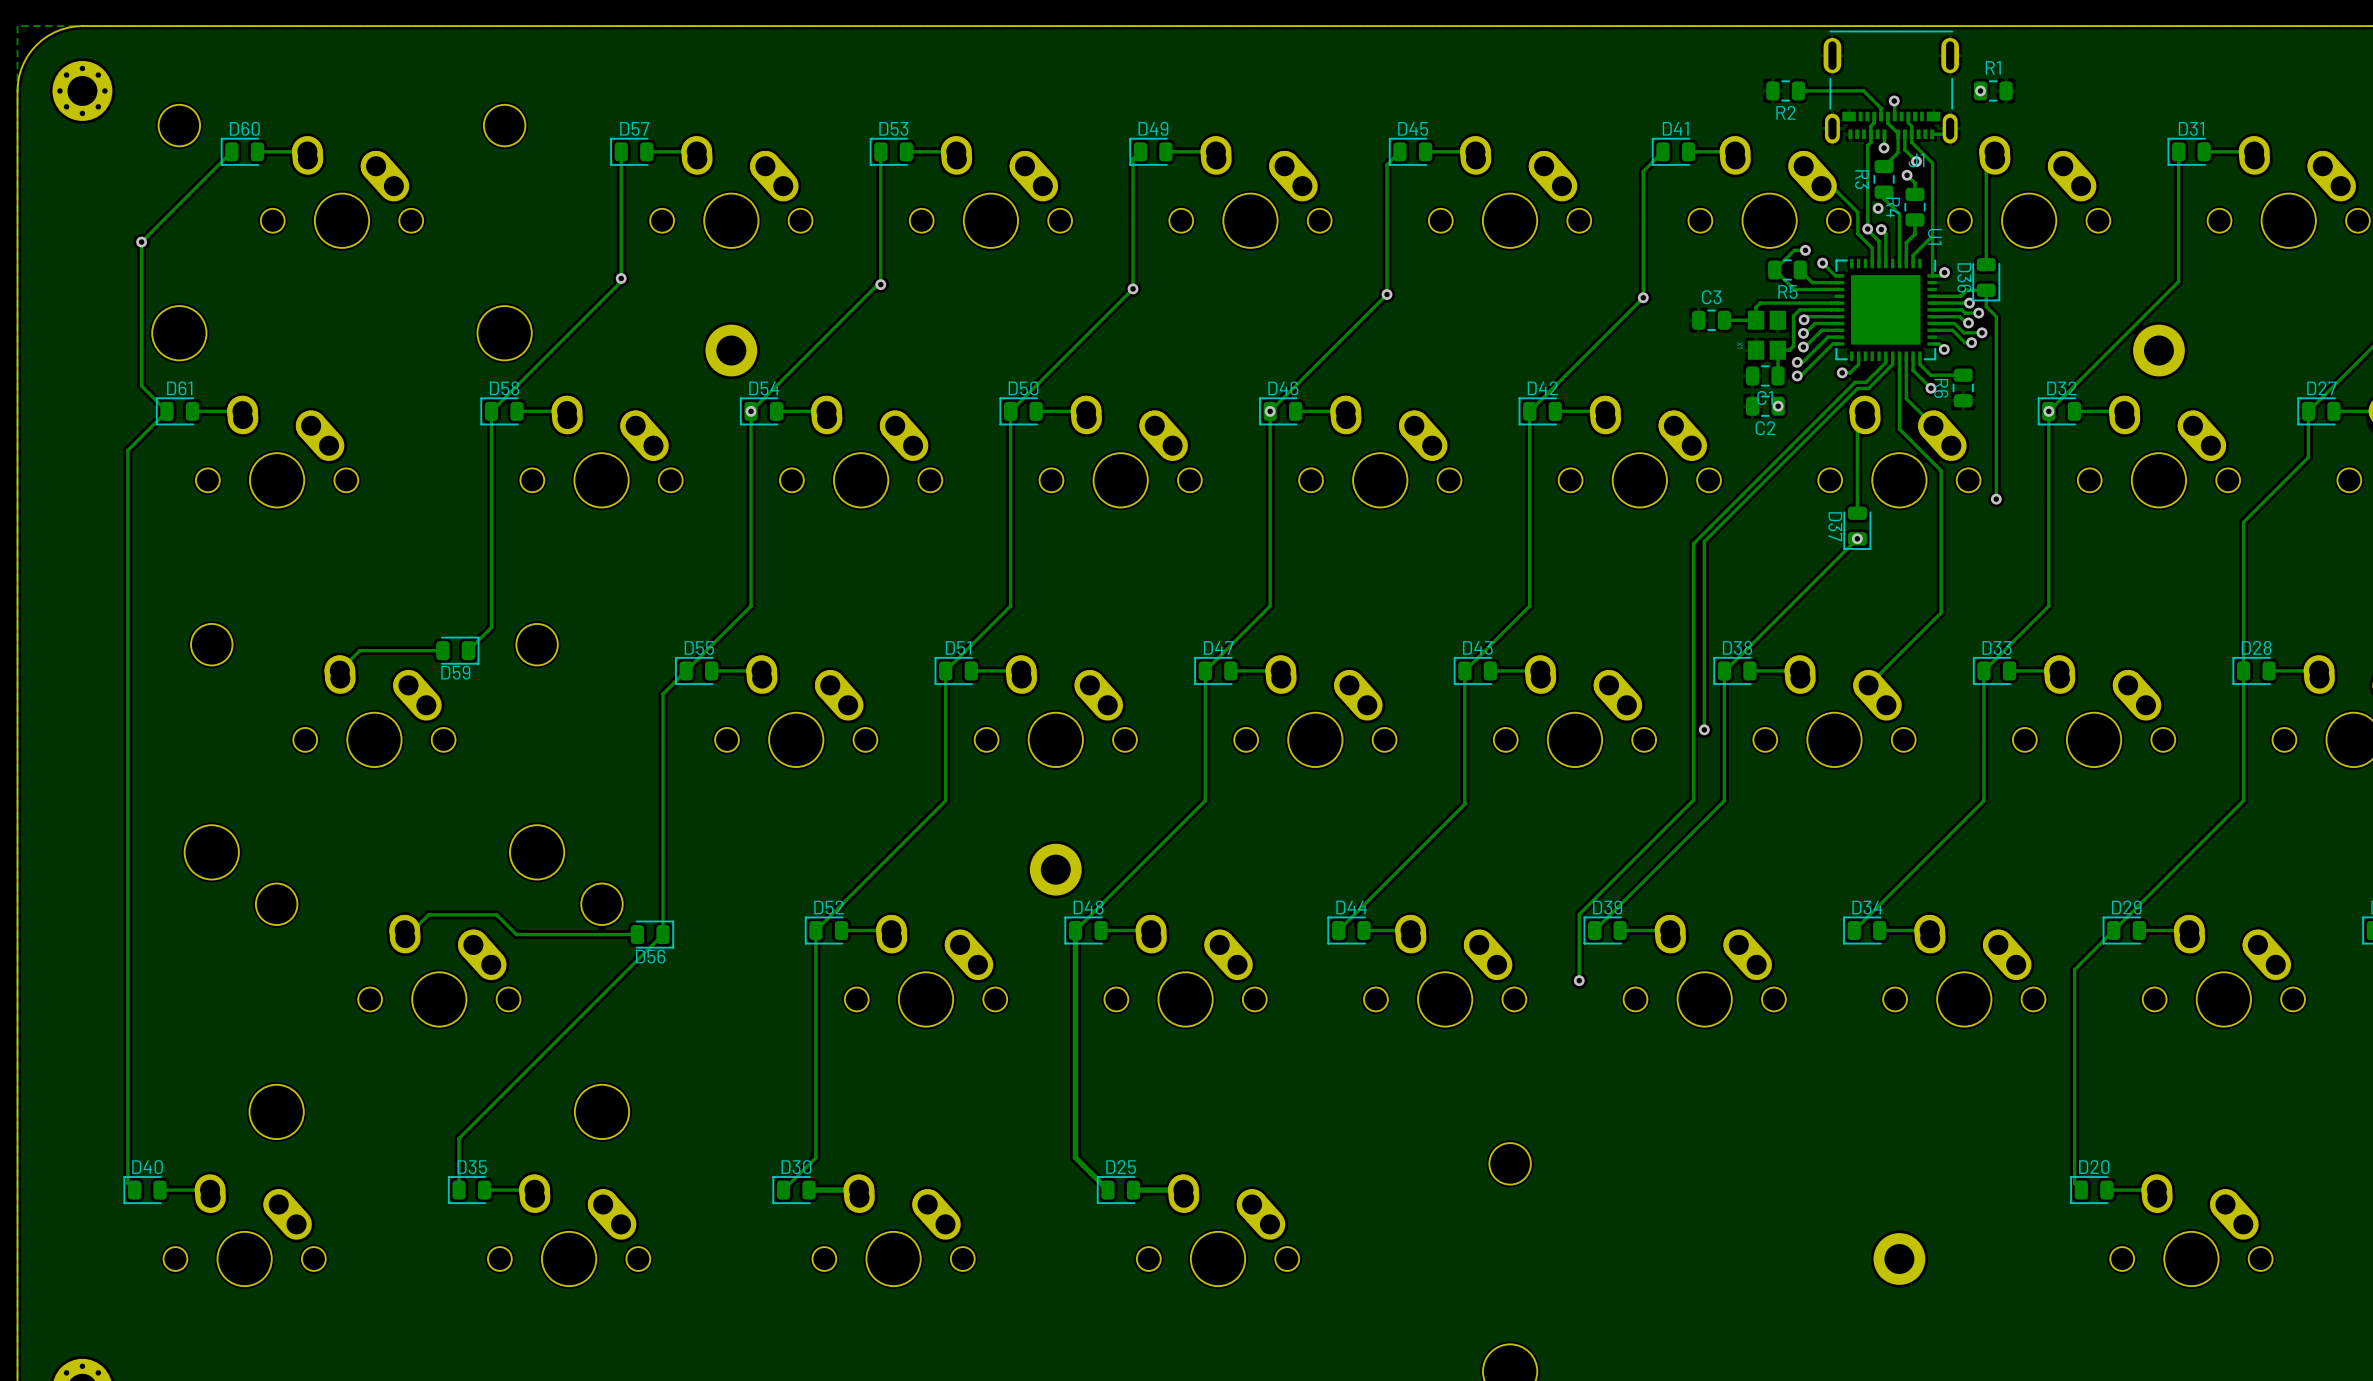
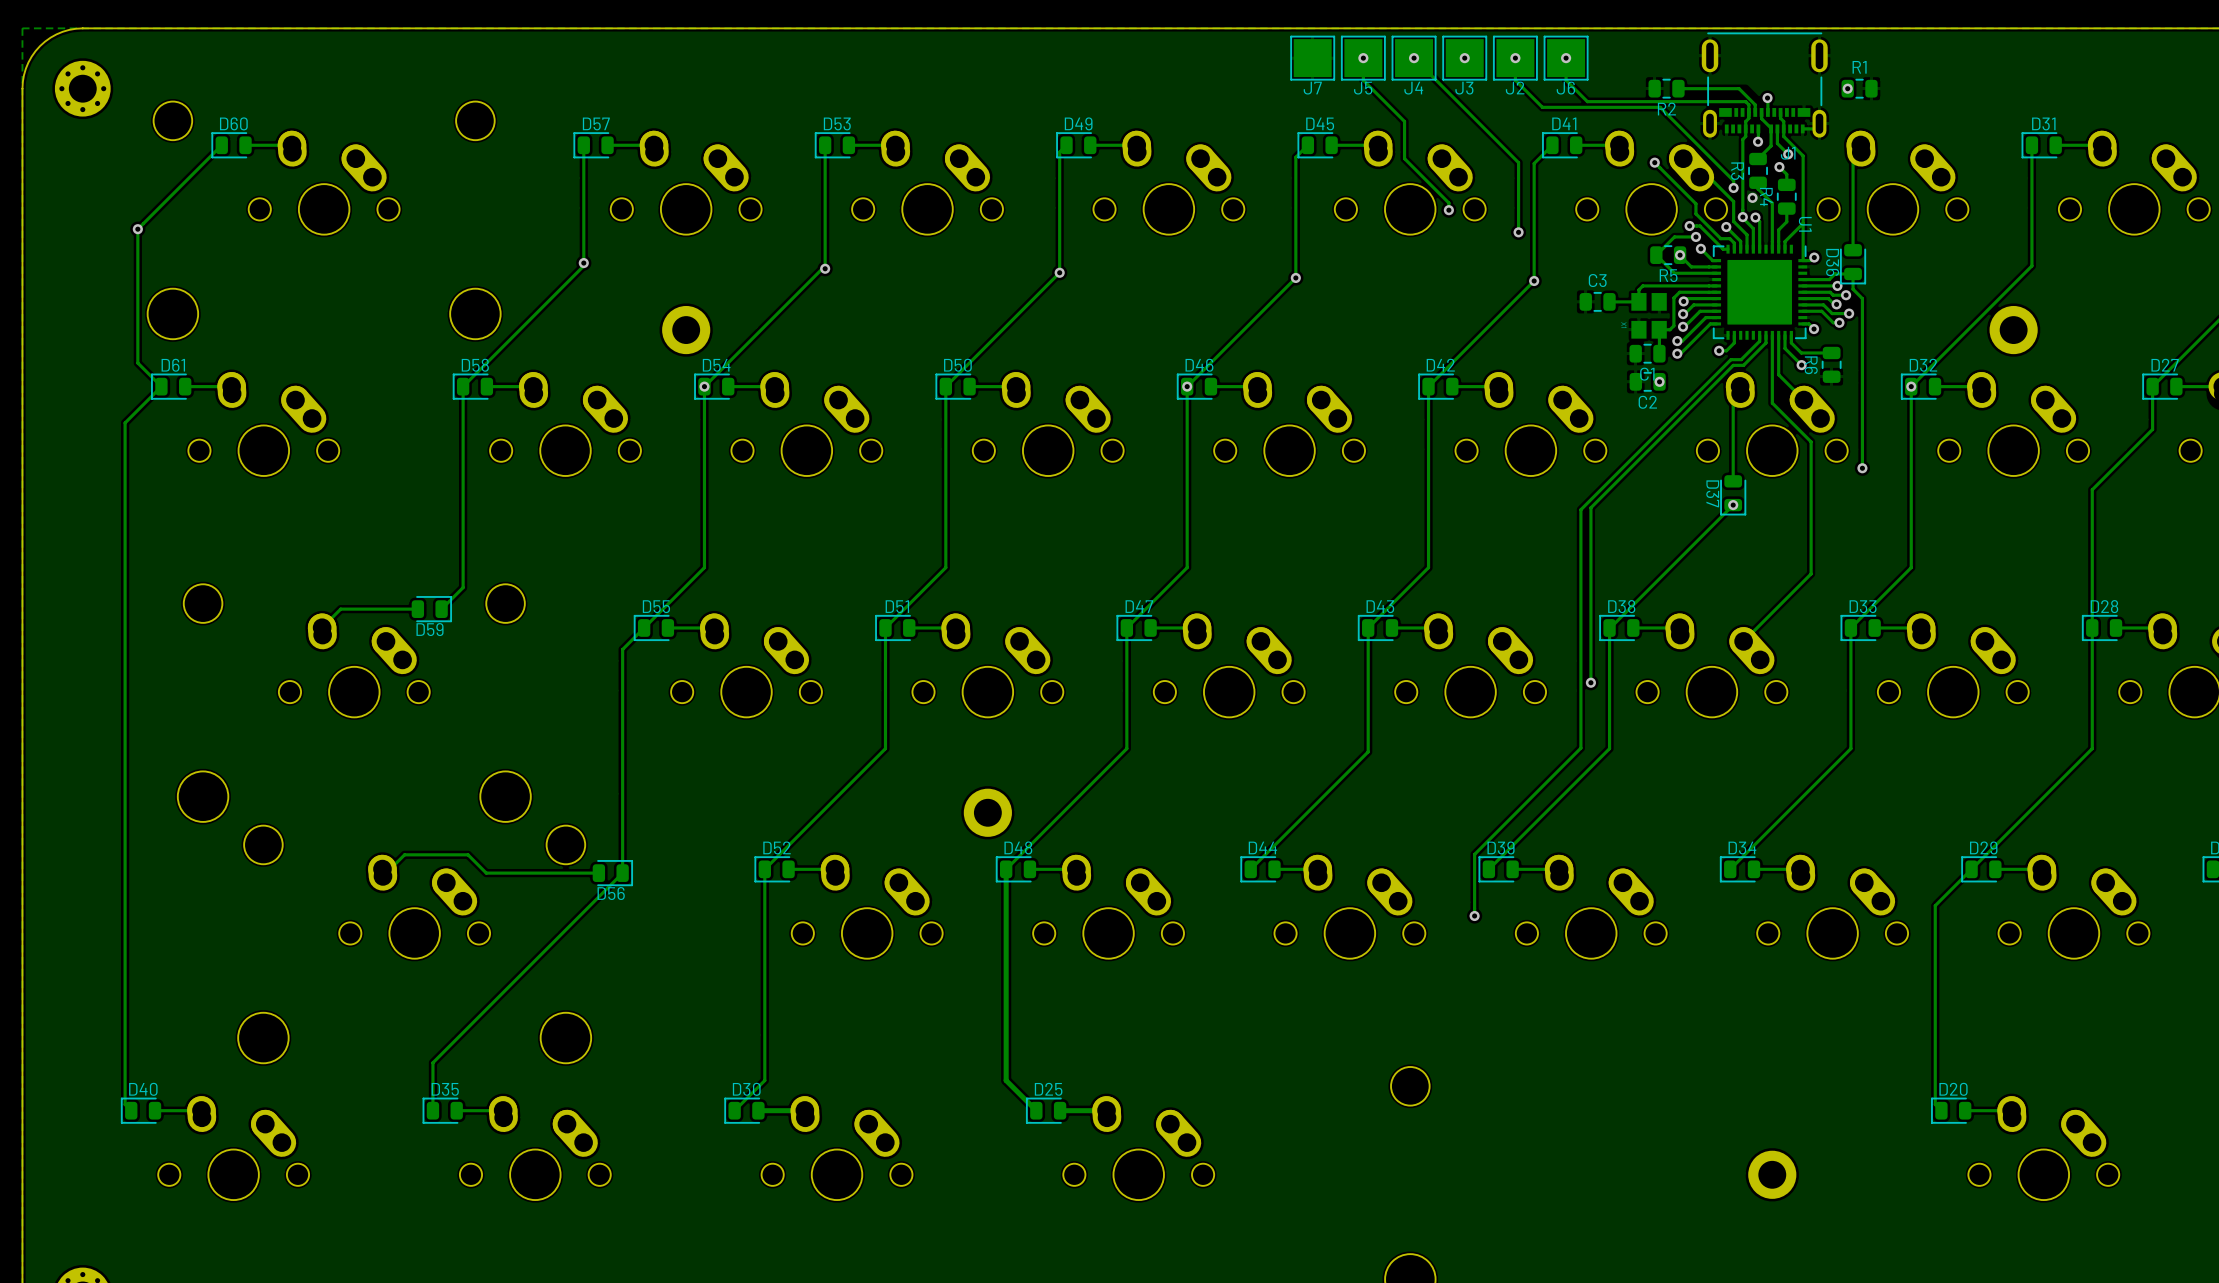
J7: none -> (1312, 58)
track: none -> (1363, 58) (1363, 80) (1404, 121) (1404, 158) (1448, 203) (1448, 210)
via: none -> (1363, 58)
J5: none -> (1363, 58)
track: none -> (1414, 58) (1518, 162) (1518, 232)
via: none -> (1414, 58)
J4: none -> (1414, 58)
via: none -> (1464, 58)
J3: none -> (1464, 58)
track: none -> (1515, 58) (1515, 80) (1542, 107) (1660, 107) (1733, 180) (1733, 187)
via: none -> (1515, 58)
J2: none -> (1515, 58)
track: none -> (1566, 58) (1566, 80) (1587, 101) (1745, 101) (1748, 104) (1748, 112)
via: none -> (1566, 58)
J6: none -> (1566, 58)
track: none -> (1654, 162) (1695, 203) (1695, 213) (1720, 238) (1729, 238) (1734, 243) (1734, 249)
via: none -> (1654, 162)
via: none -> (1733, 187)
via: none -> (1448, 210)
track: none -> (1689, 226) (1699, 226) (1723, 249) (1728, 249)
via: none -> (1689, 226)
track: none -> (1726, 226) (1740, 241) (1740, 249)
via: none -> (1726, 226)
via: none -> (1518, 232)
via: (1805, 250) -> none
via: none -> (1695, 236)
via: none -> (1680, 255)

